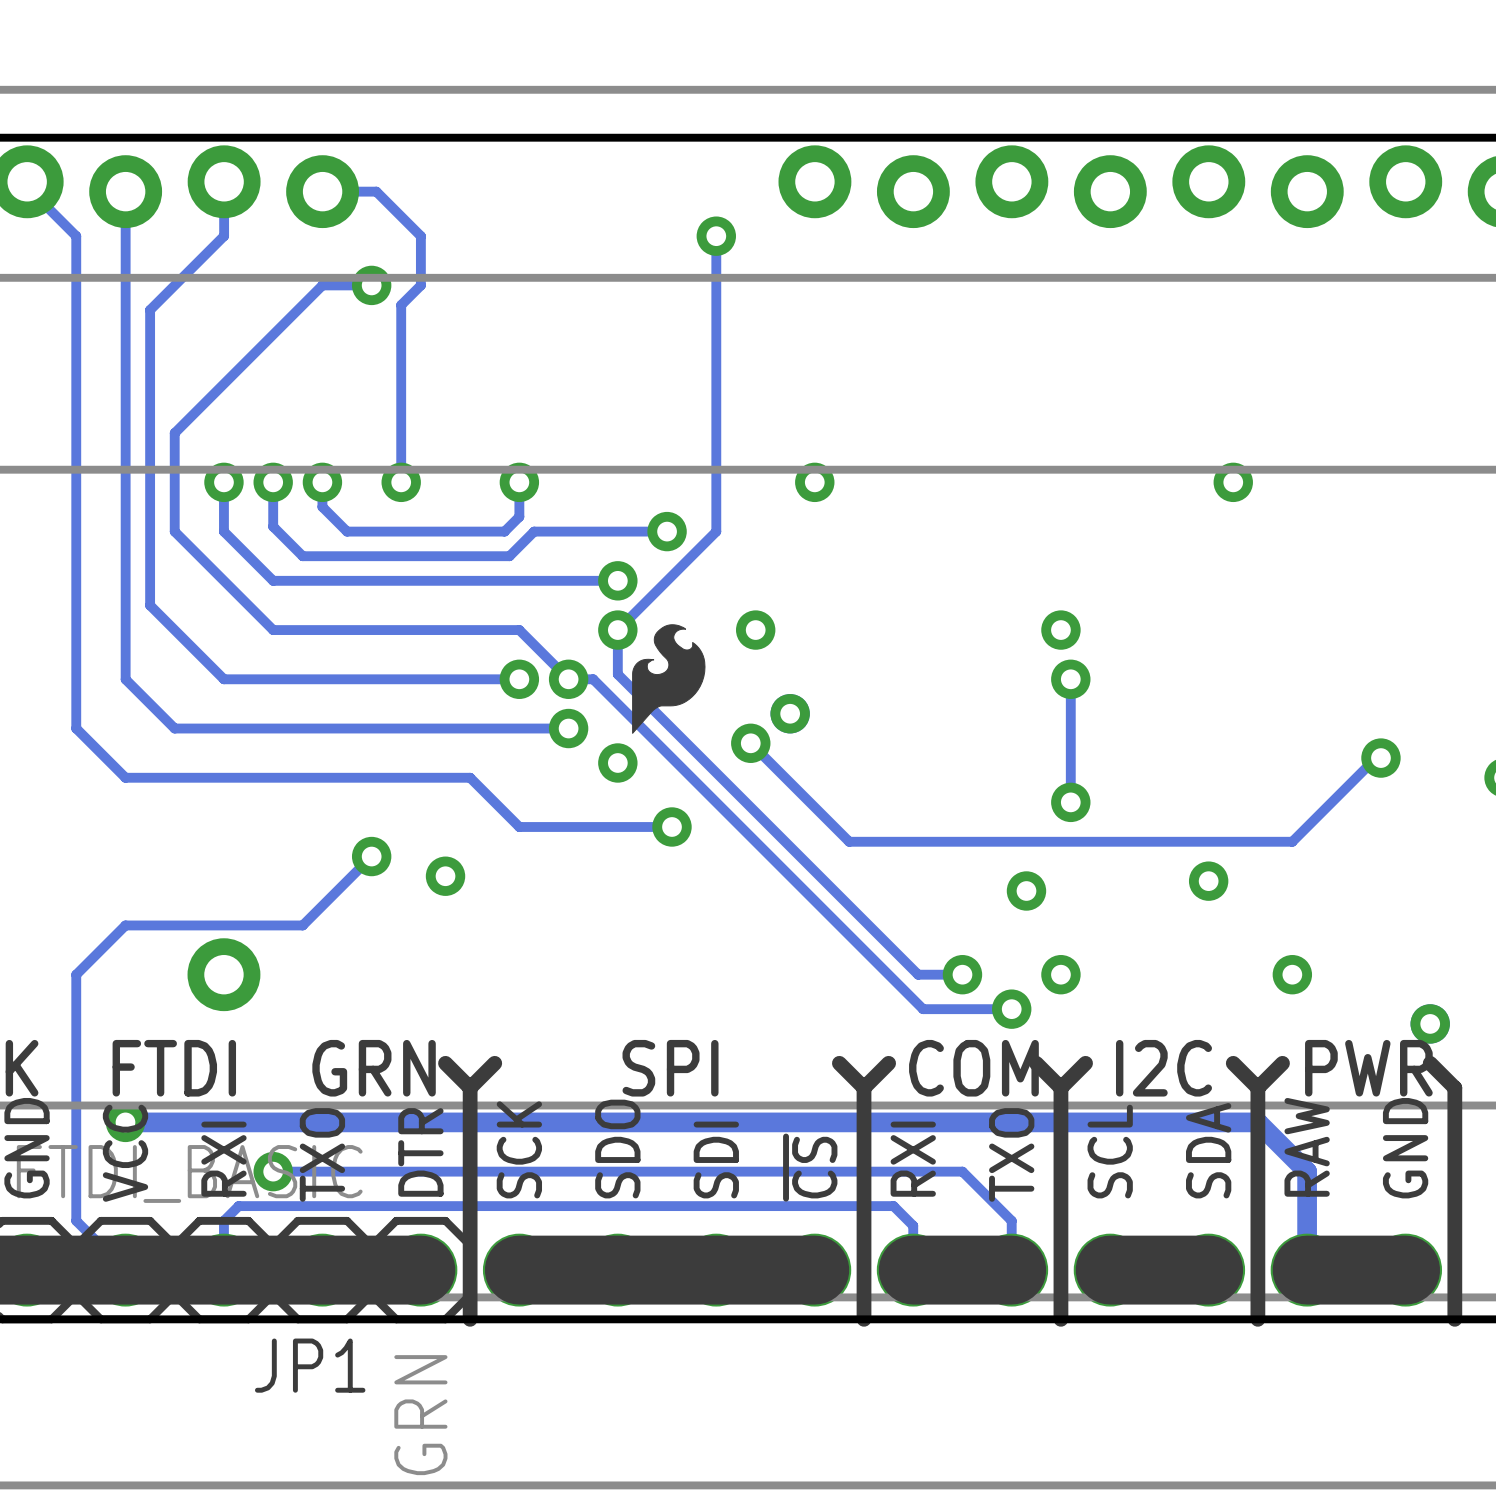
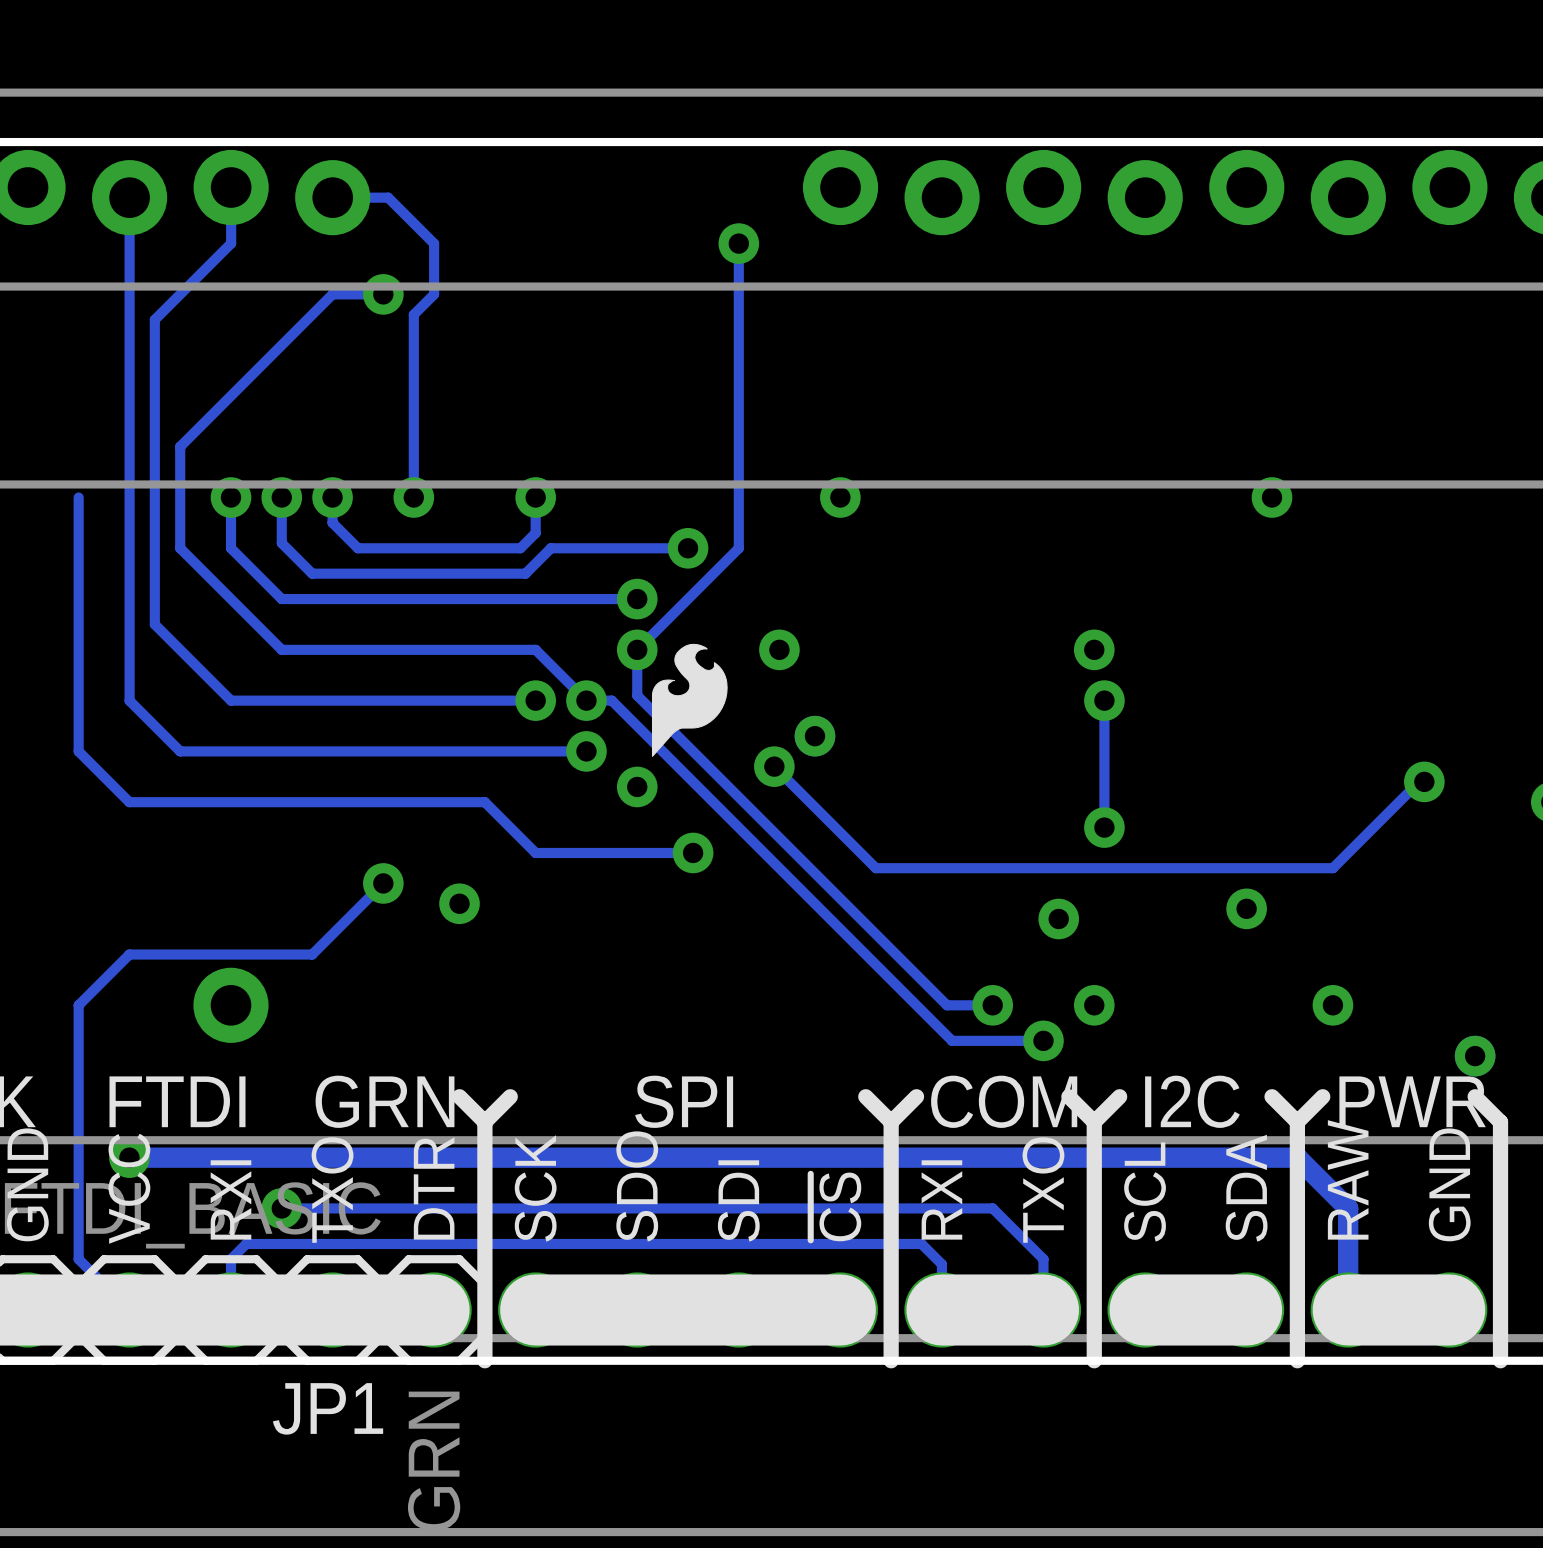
track: (27, 181) (27, 186) (76, 236) (76, 482) -> none

